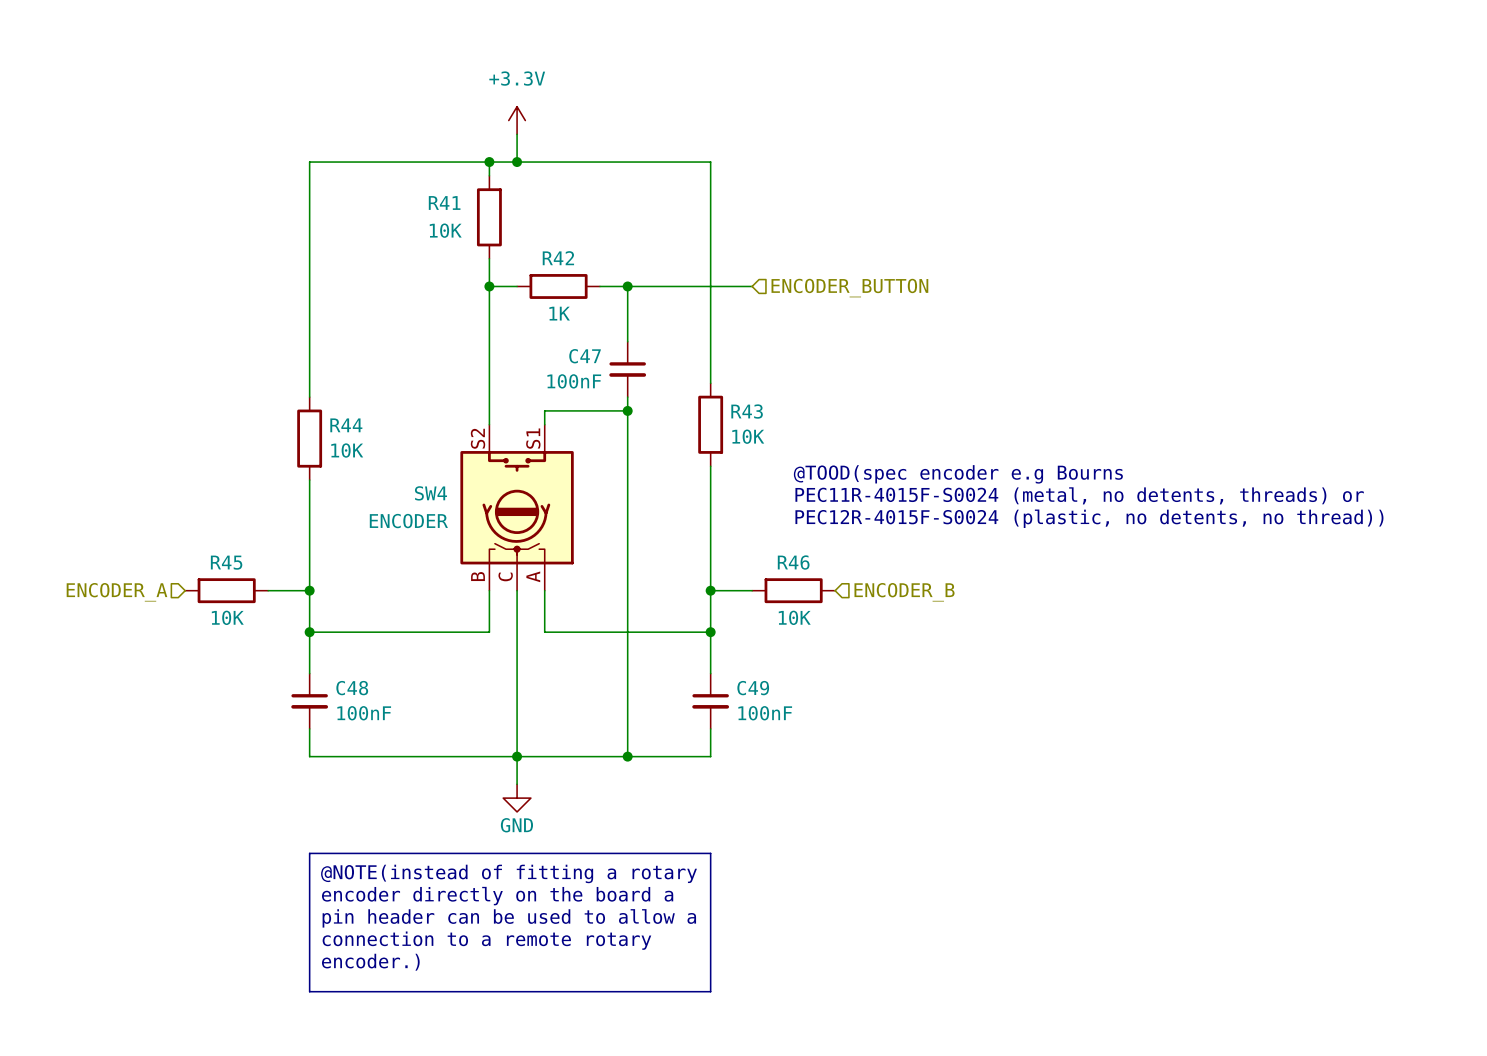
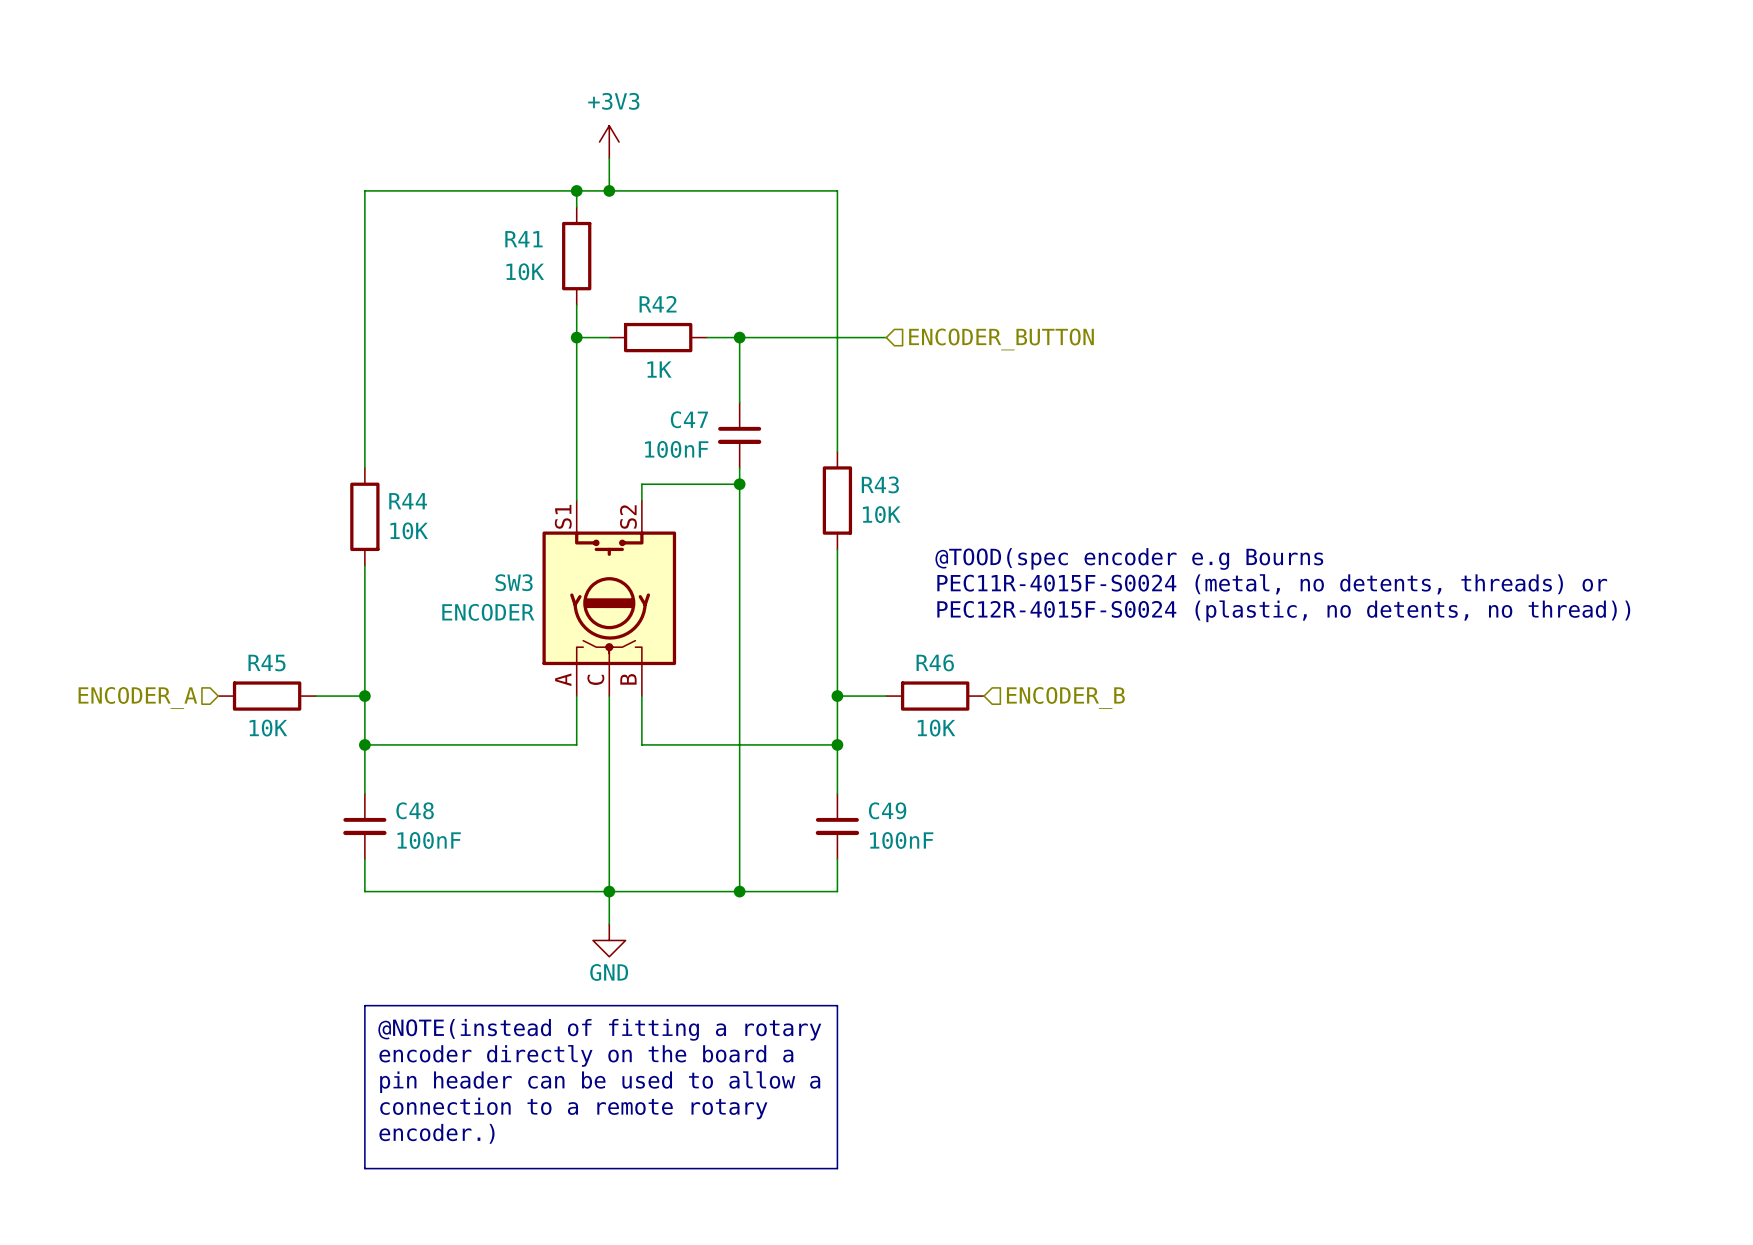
power symbol: +3.3V (517, 120) -> +3V3 (609, 142)
SW4: ENCODER (517, 507) -> none
SW3: none -> ENCODER (609, 598)

